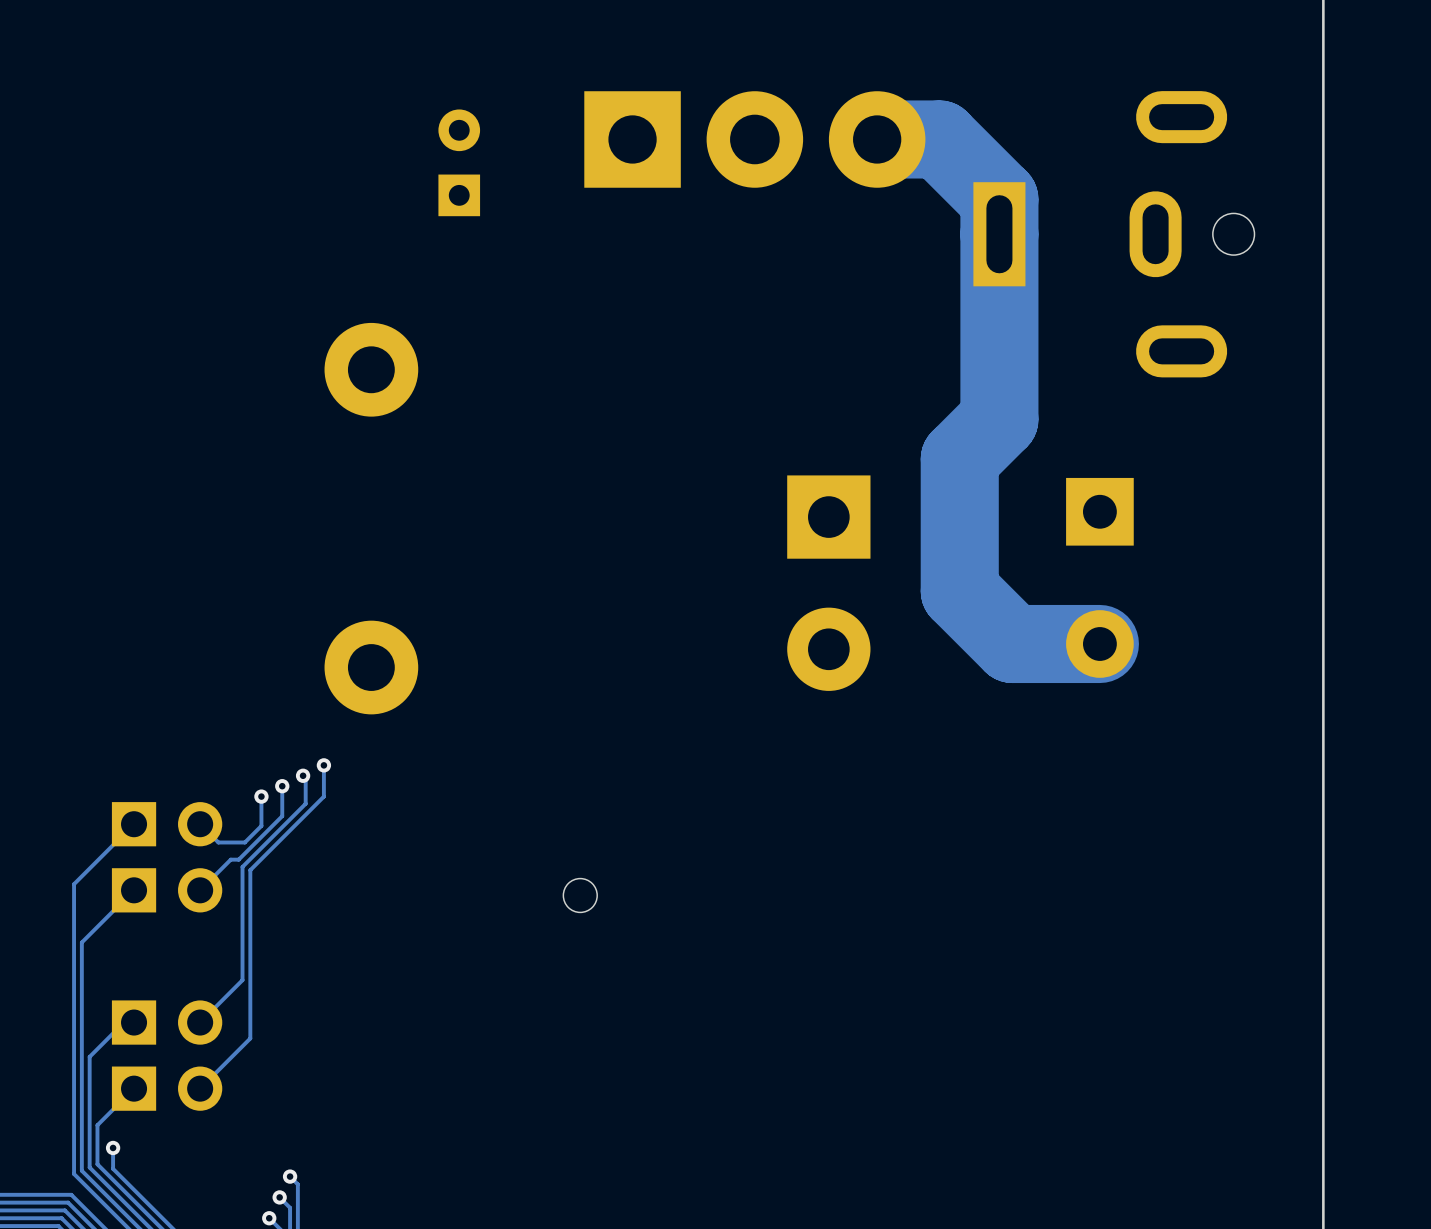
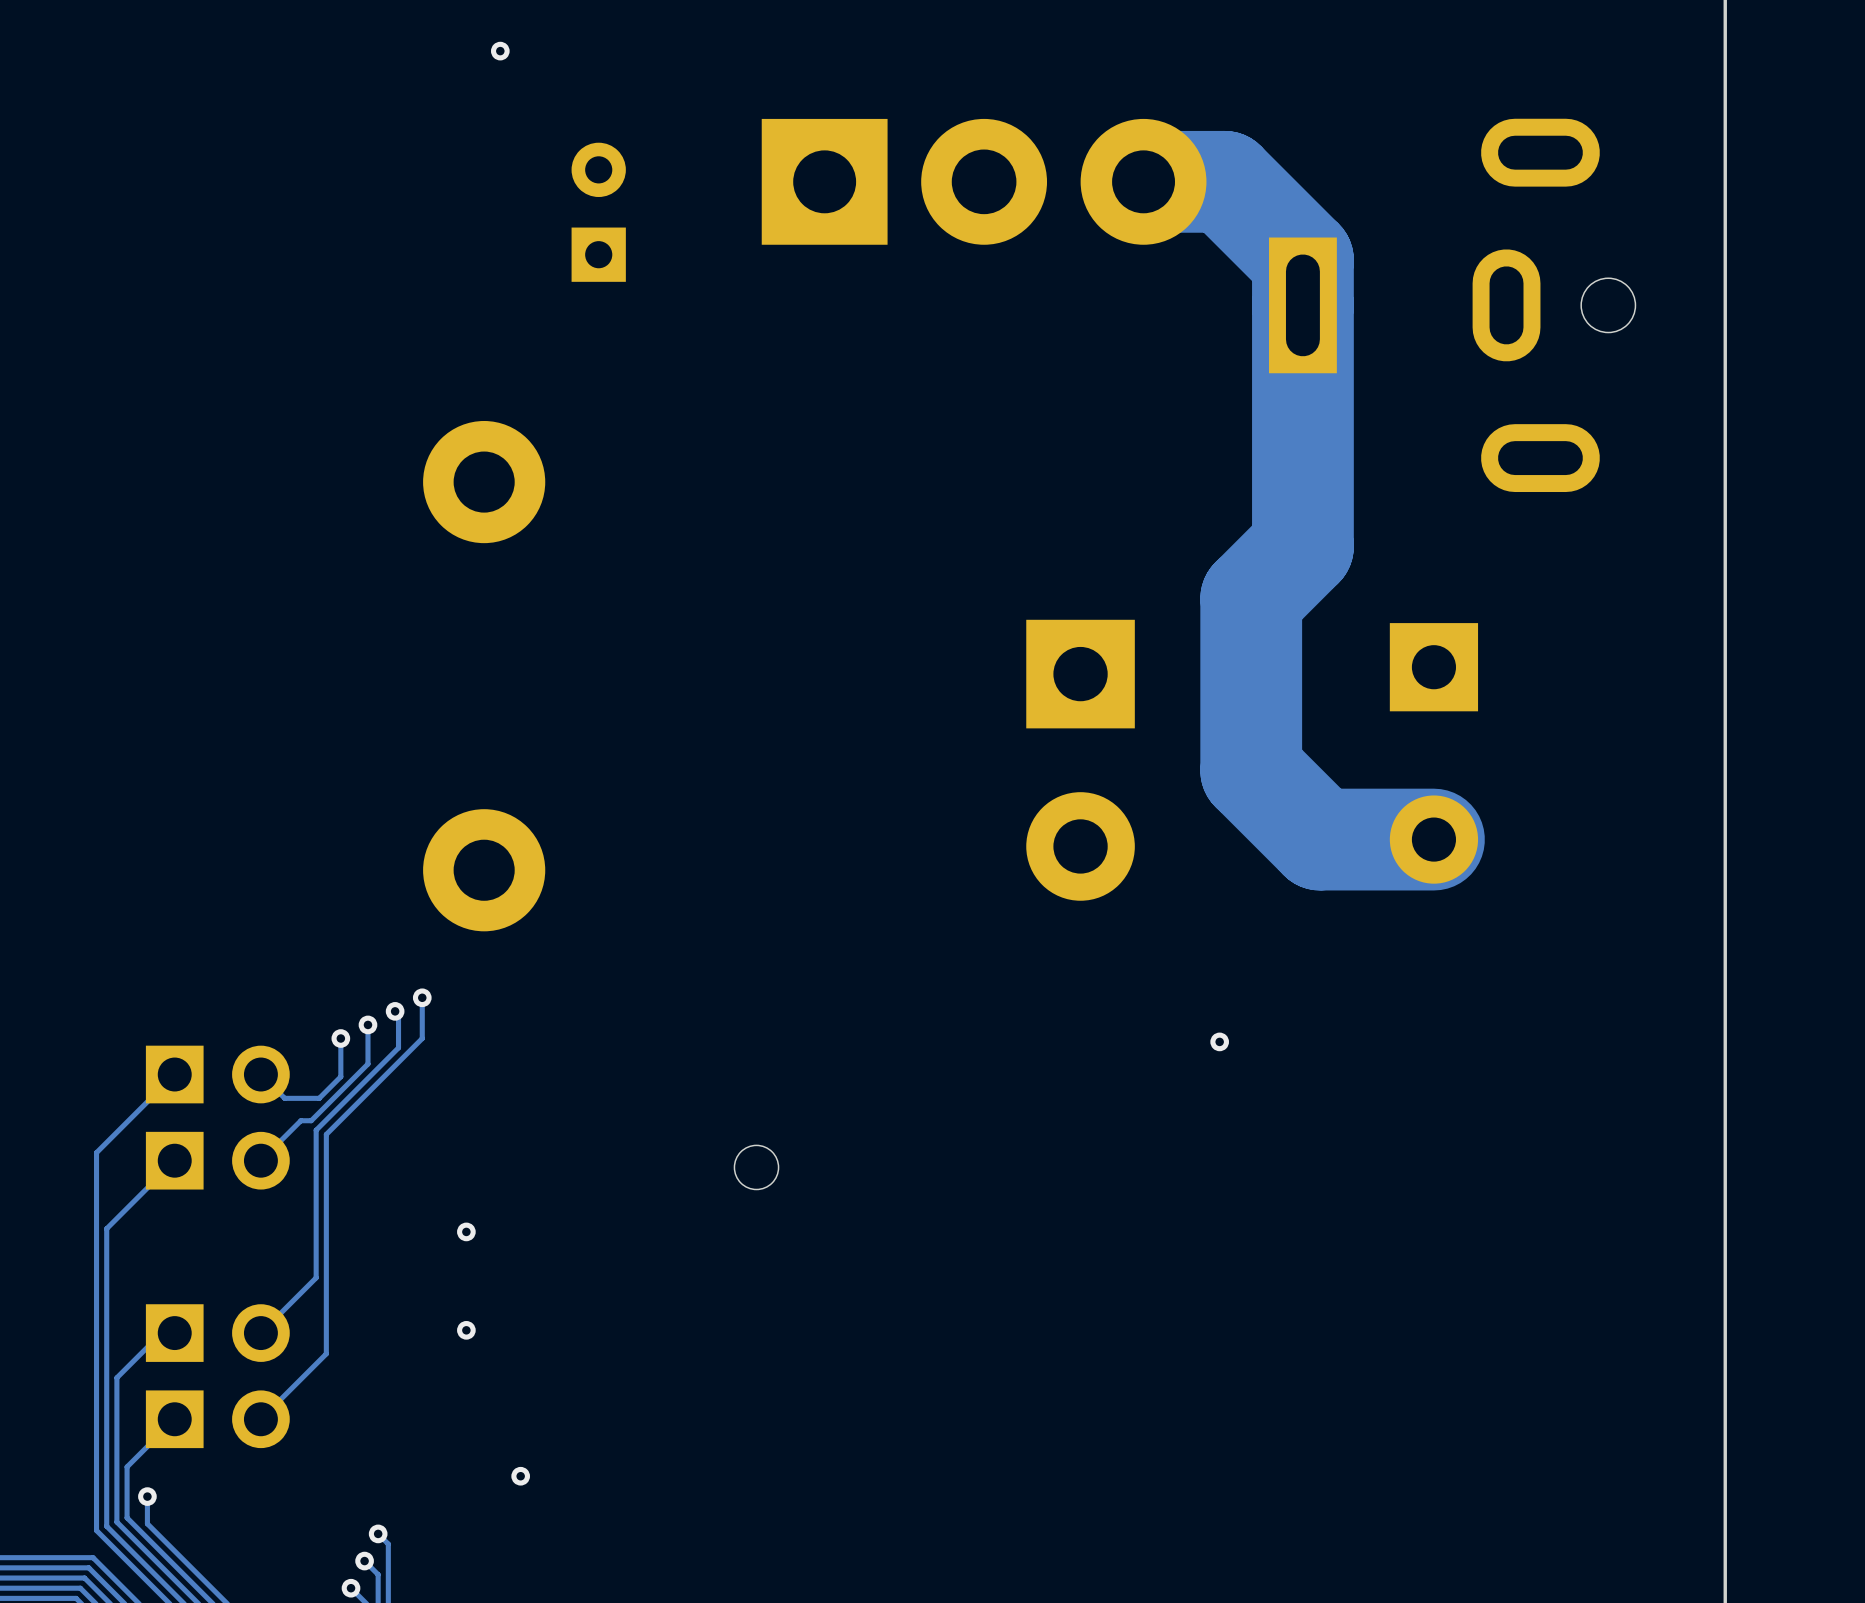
via: none -> (500, 51)
via: none -> (1219, 1041)
via: none -> (466, 1231)
via: none -> (466, 1330)
via: none -> (520, 1476)

